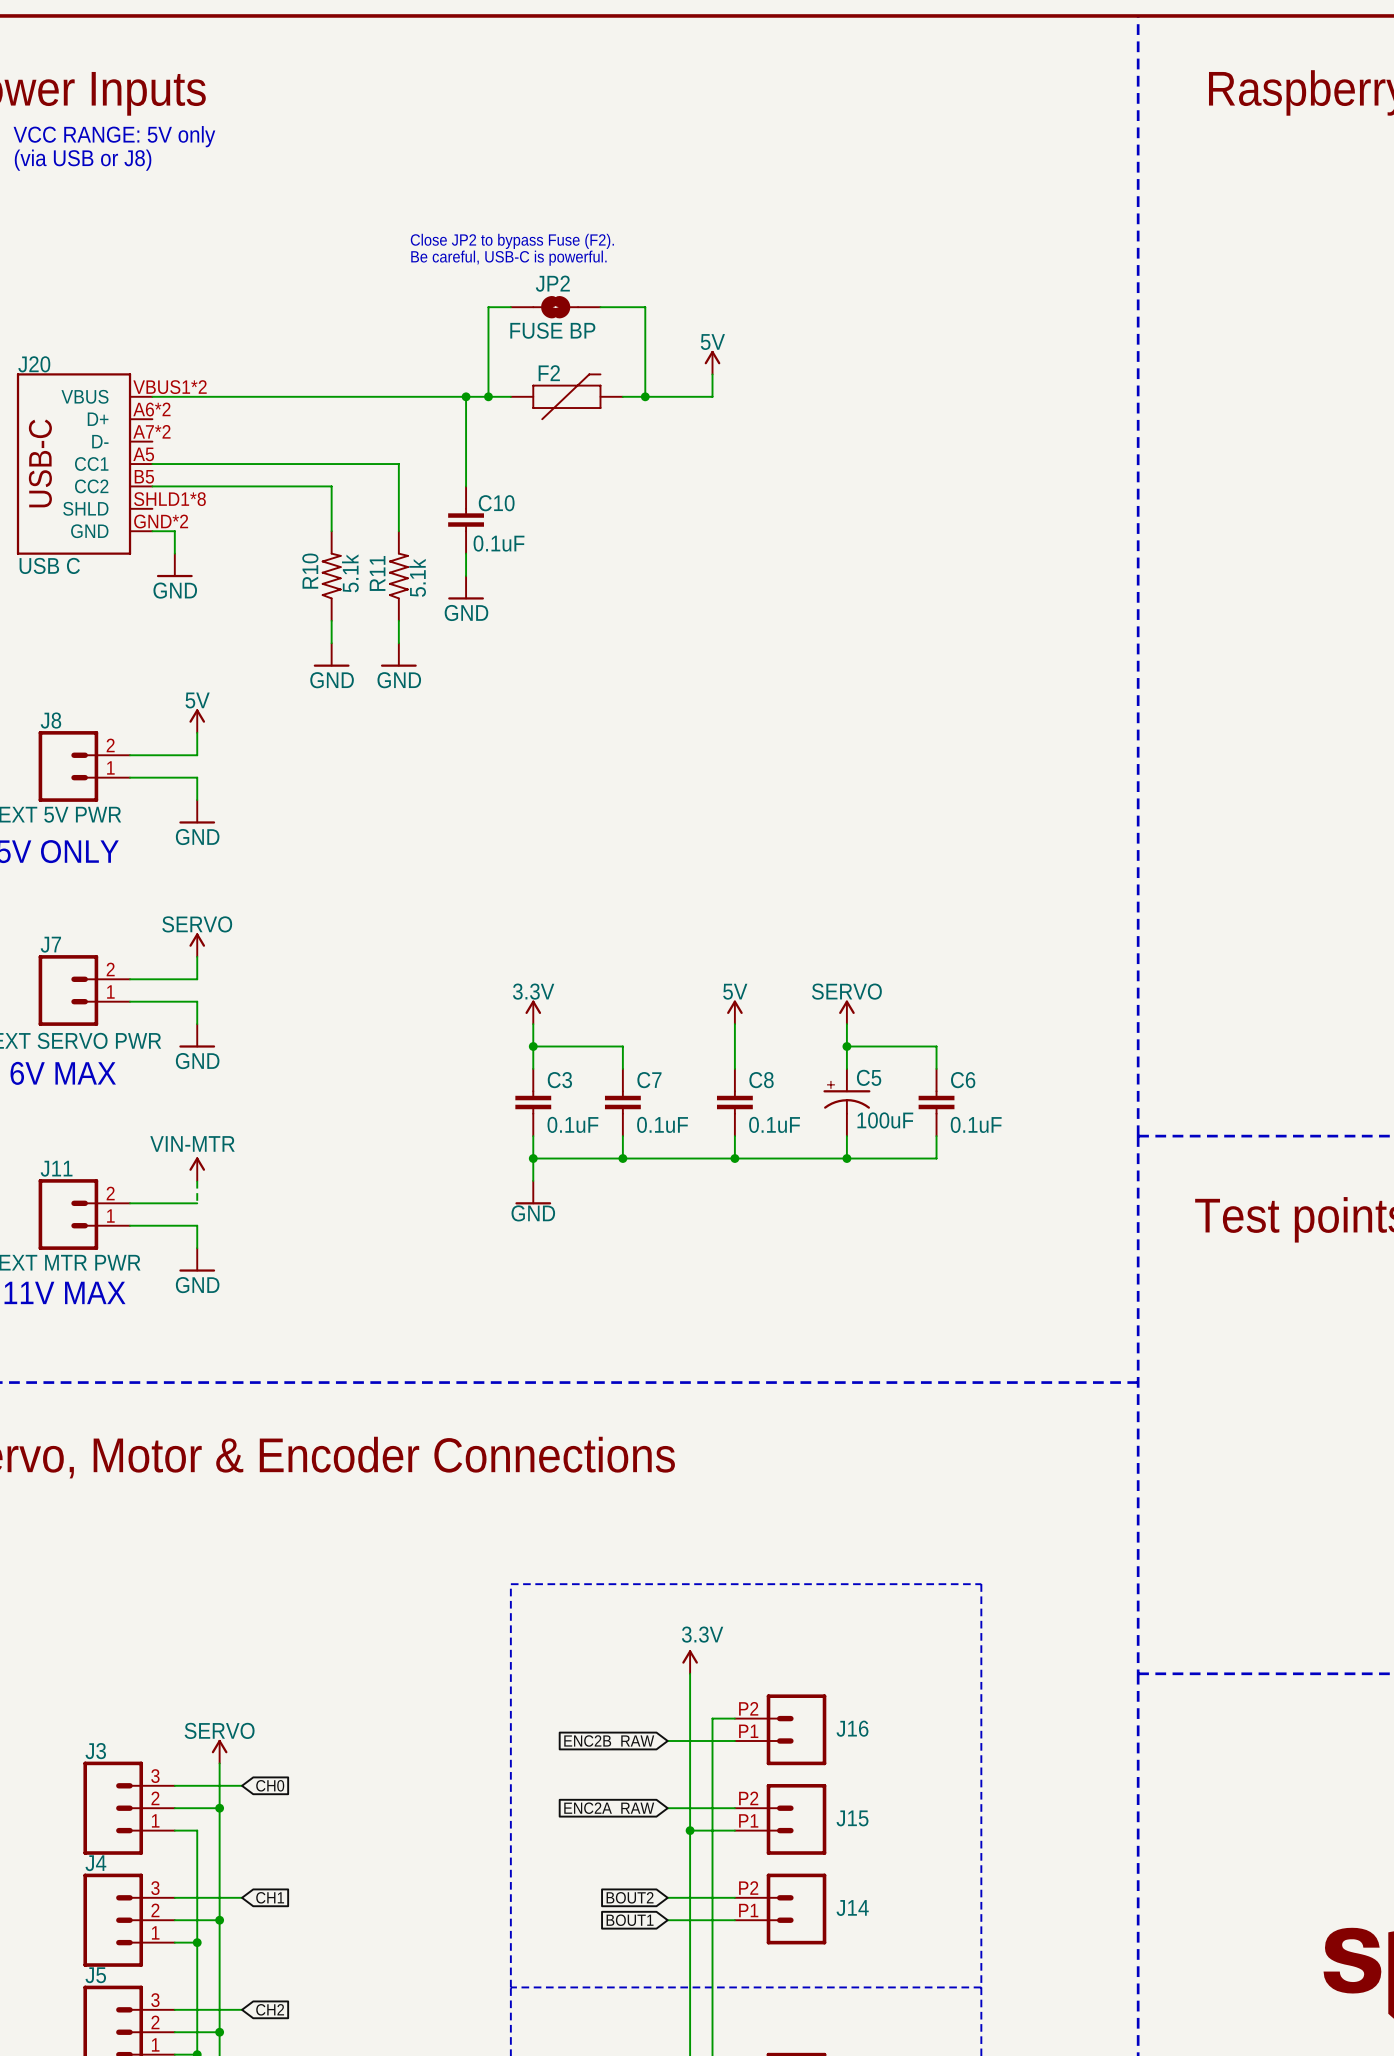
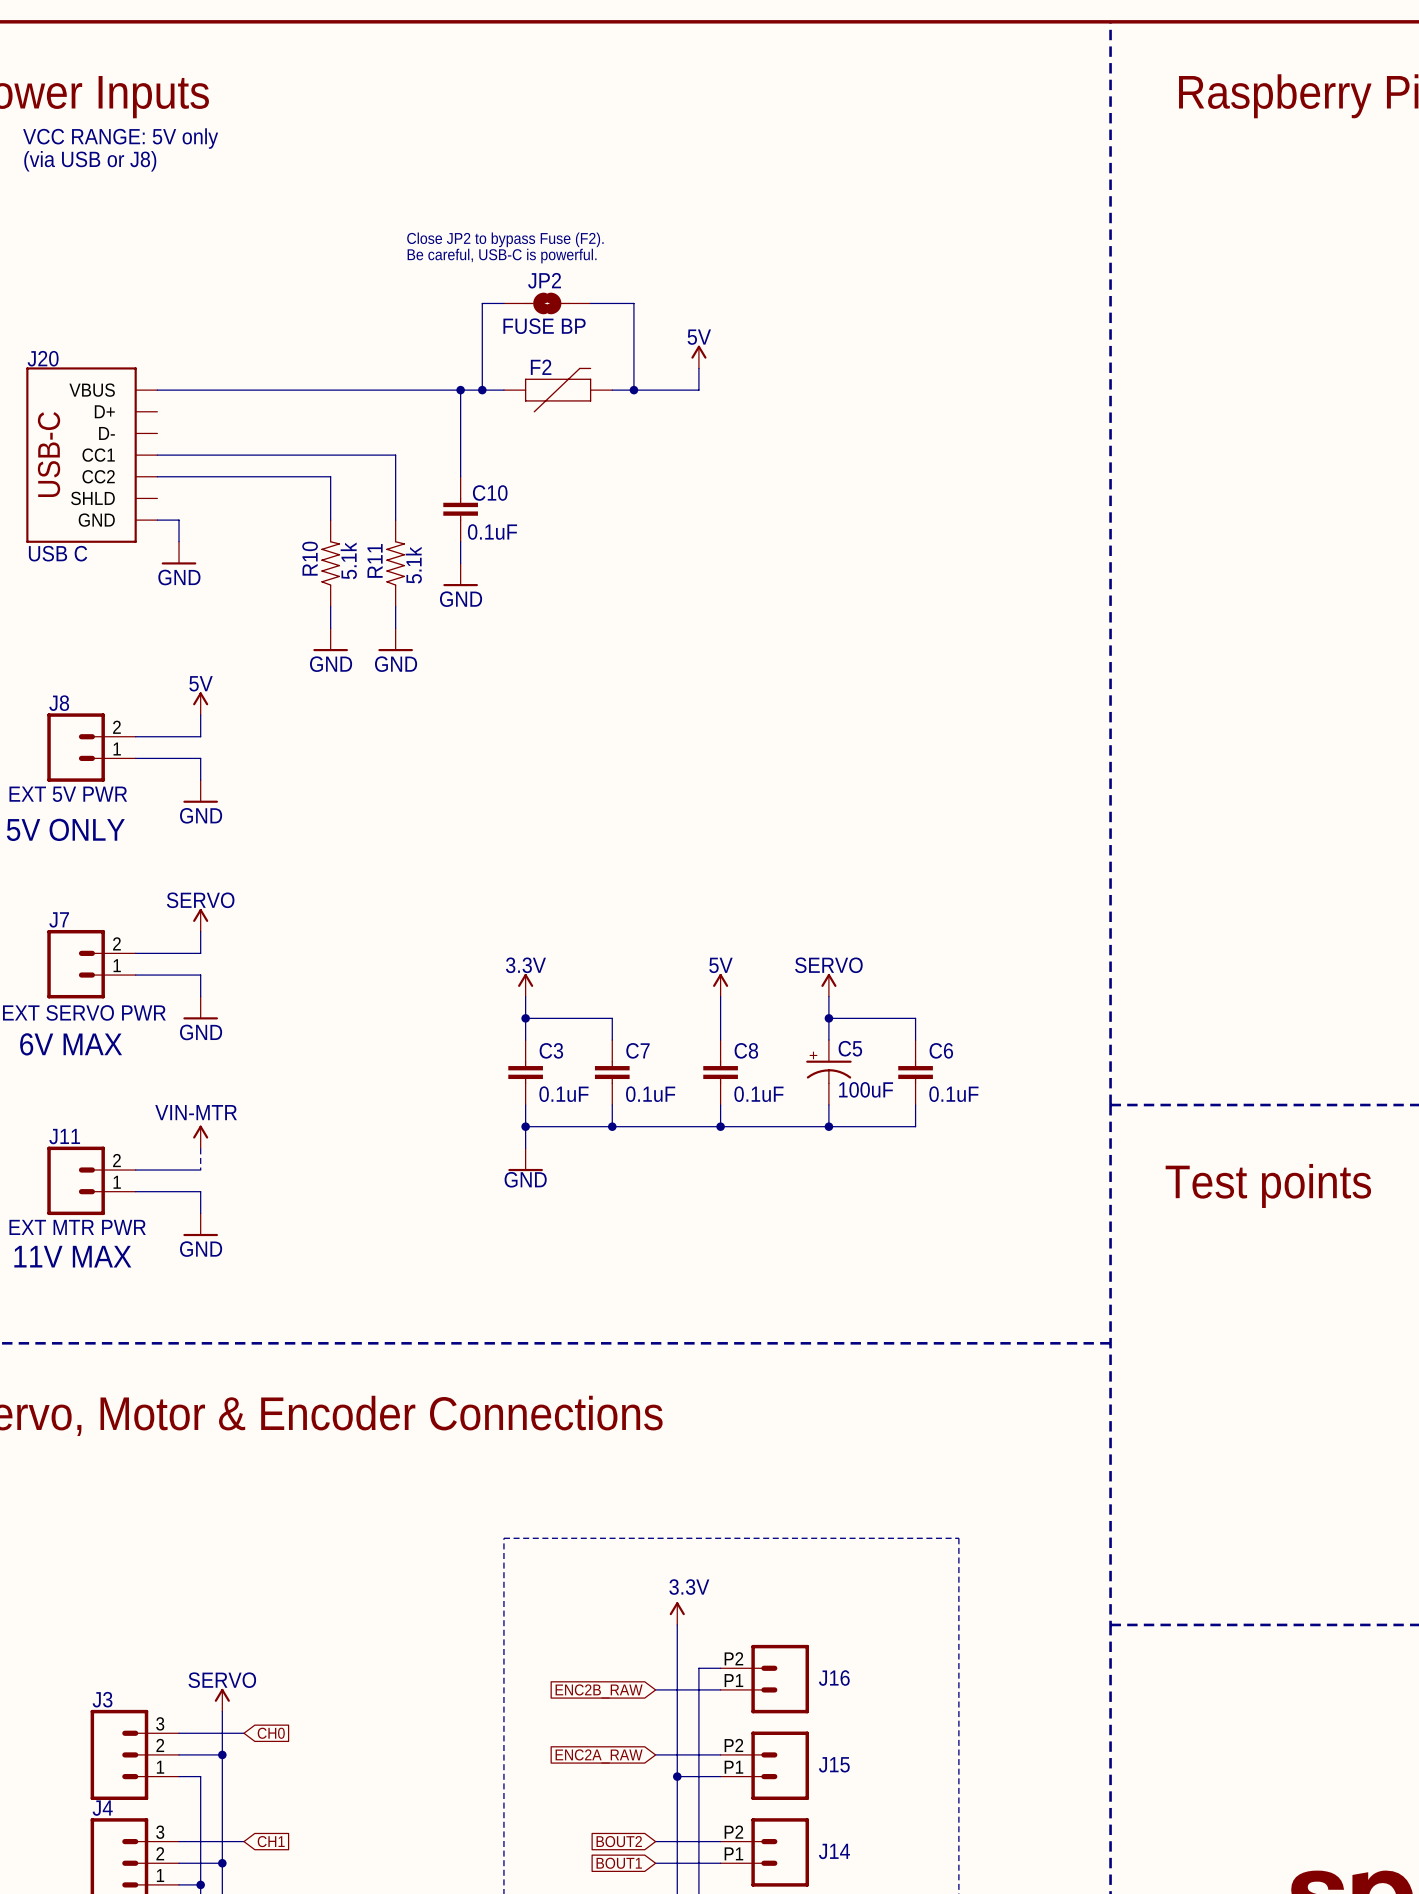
J20 pin number: VBUS1*2 (170, 387) -> none
J20 pin number: A6*2 (151, 409) -> none
J20 pin number: A7*2 (151, 431) -> none
J20 pin number: A5 (143, 454) -> none
J20 pin number: B5 (144, 476) -> none
J20 pin number: SHLD1*8 (169, 499) -> none
J20 pin number: GND*2 (161, 521) -> none

